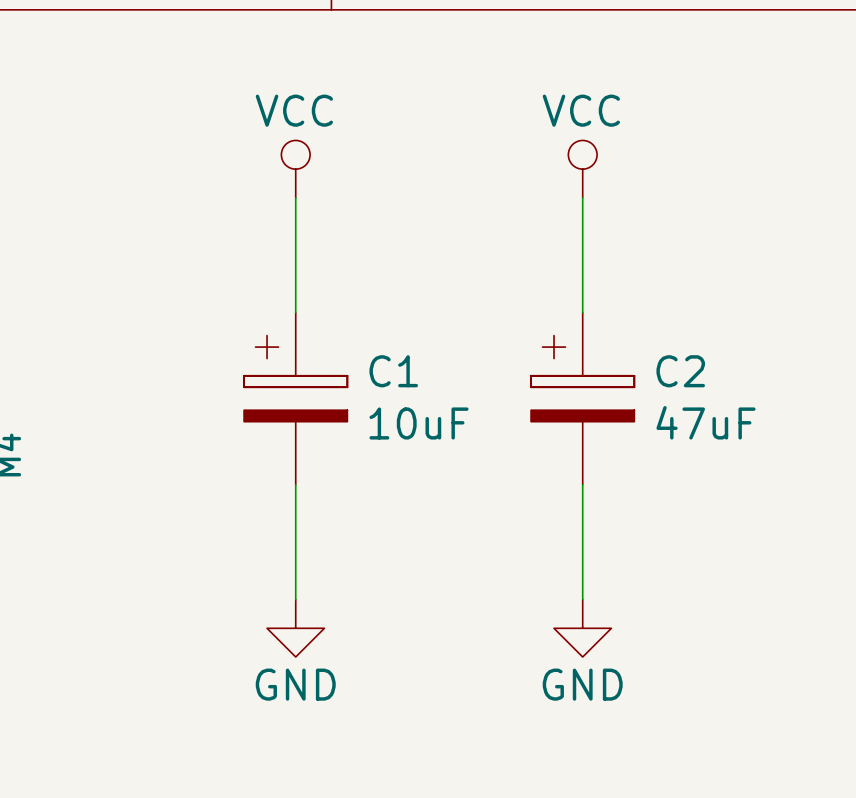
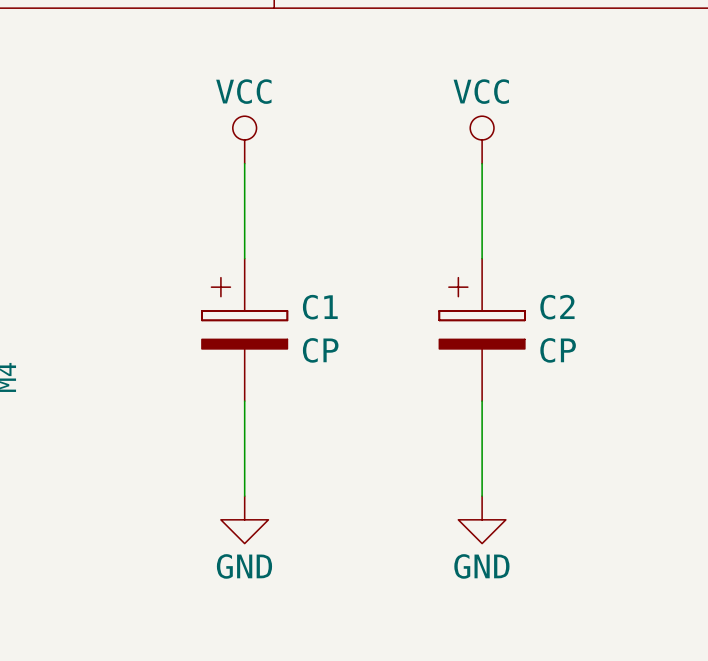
C2 value: 47uF (705, 422) -> CP (558, 350)
C1 value: 10uF (419, 423) -> CP (320, 350)

